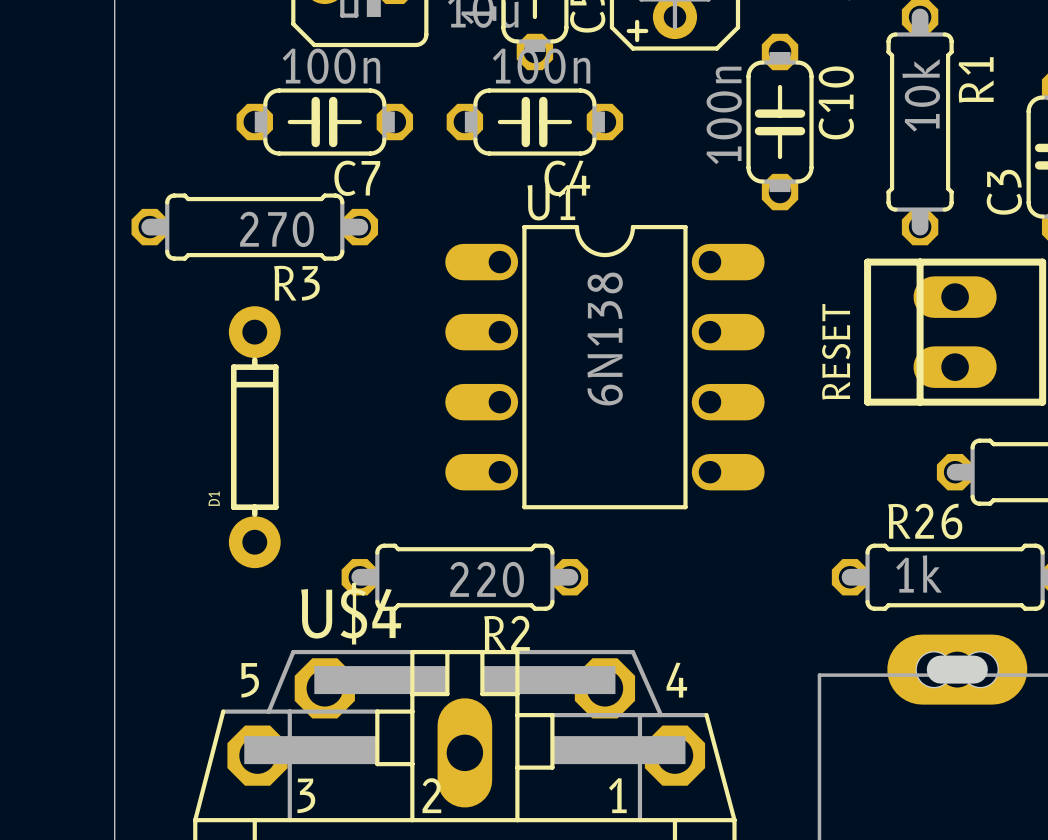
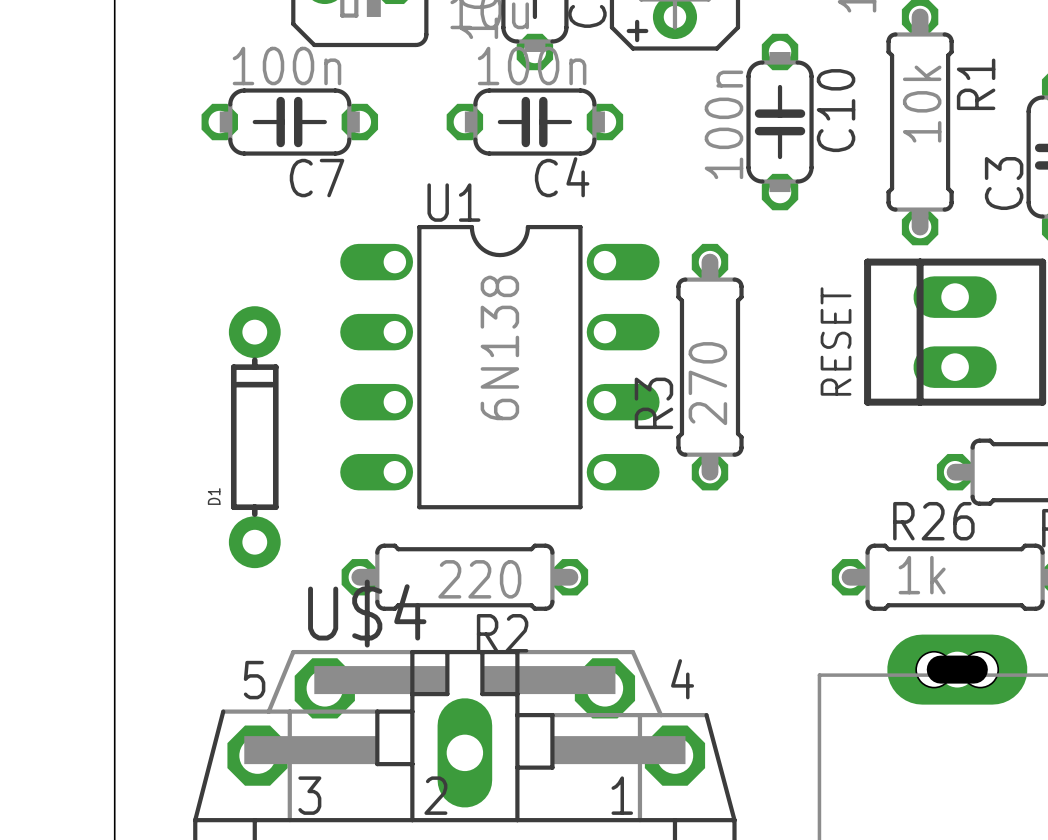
C7 position: (324, 122) -> (289, 122)
R3 rotation: 0° (254, 227) -> 90° clockwise (709, 367)
R3 position: (254, 227) -> (709, 367)
U1 position: (604, 367) -> (499, 367)

